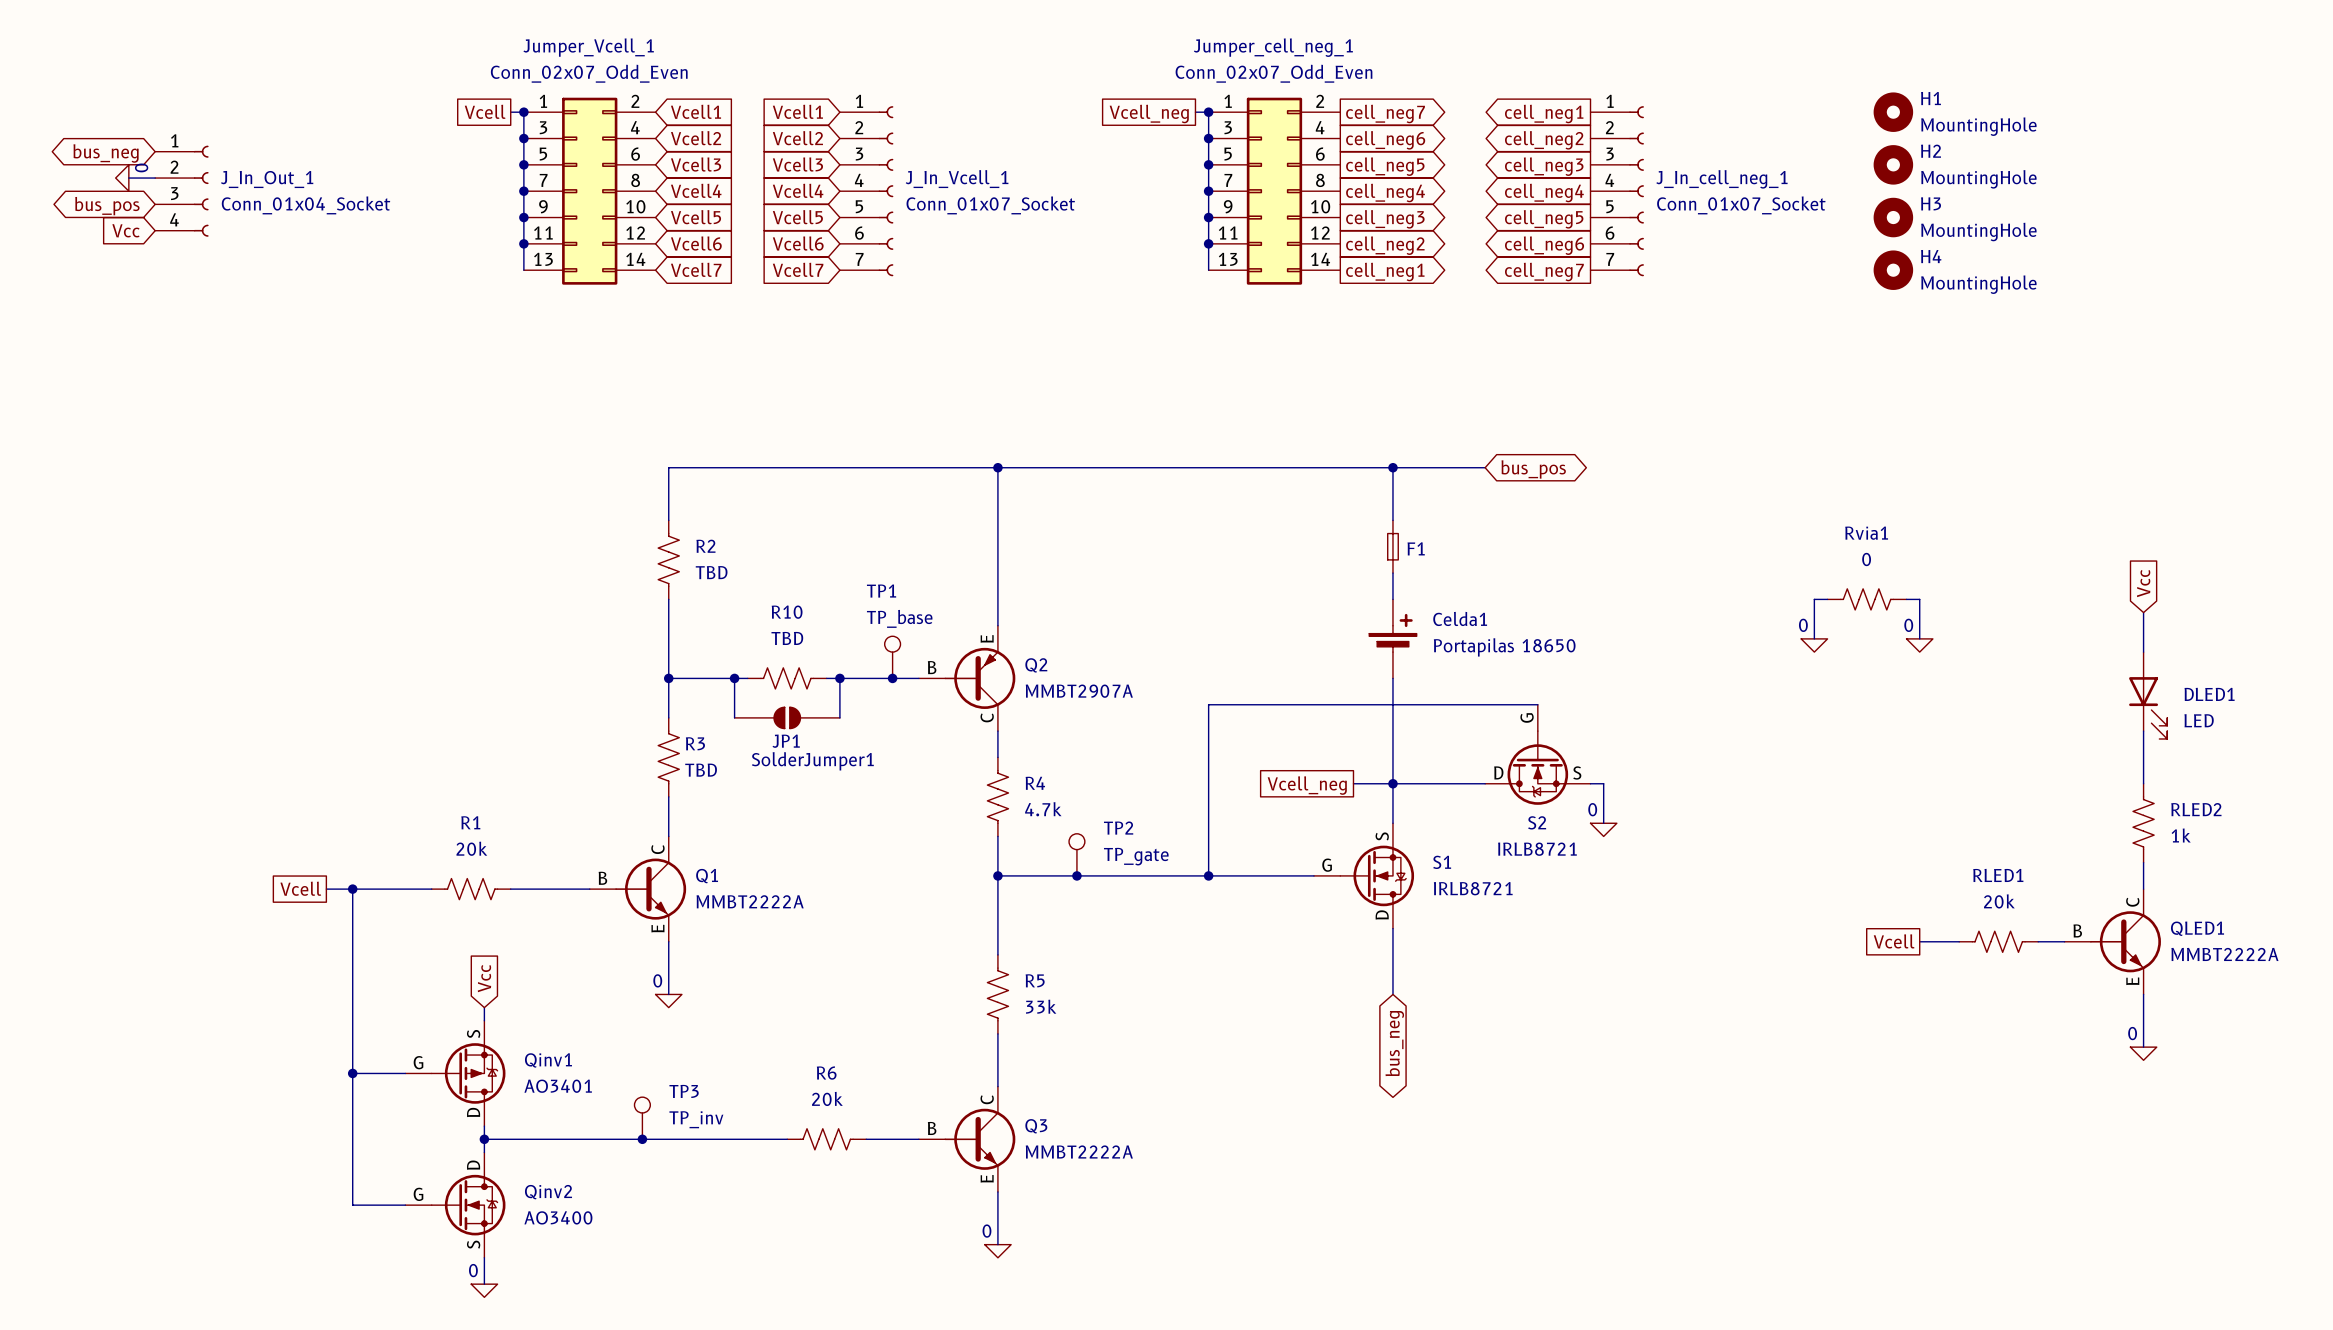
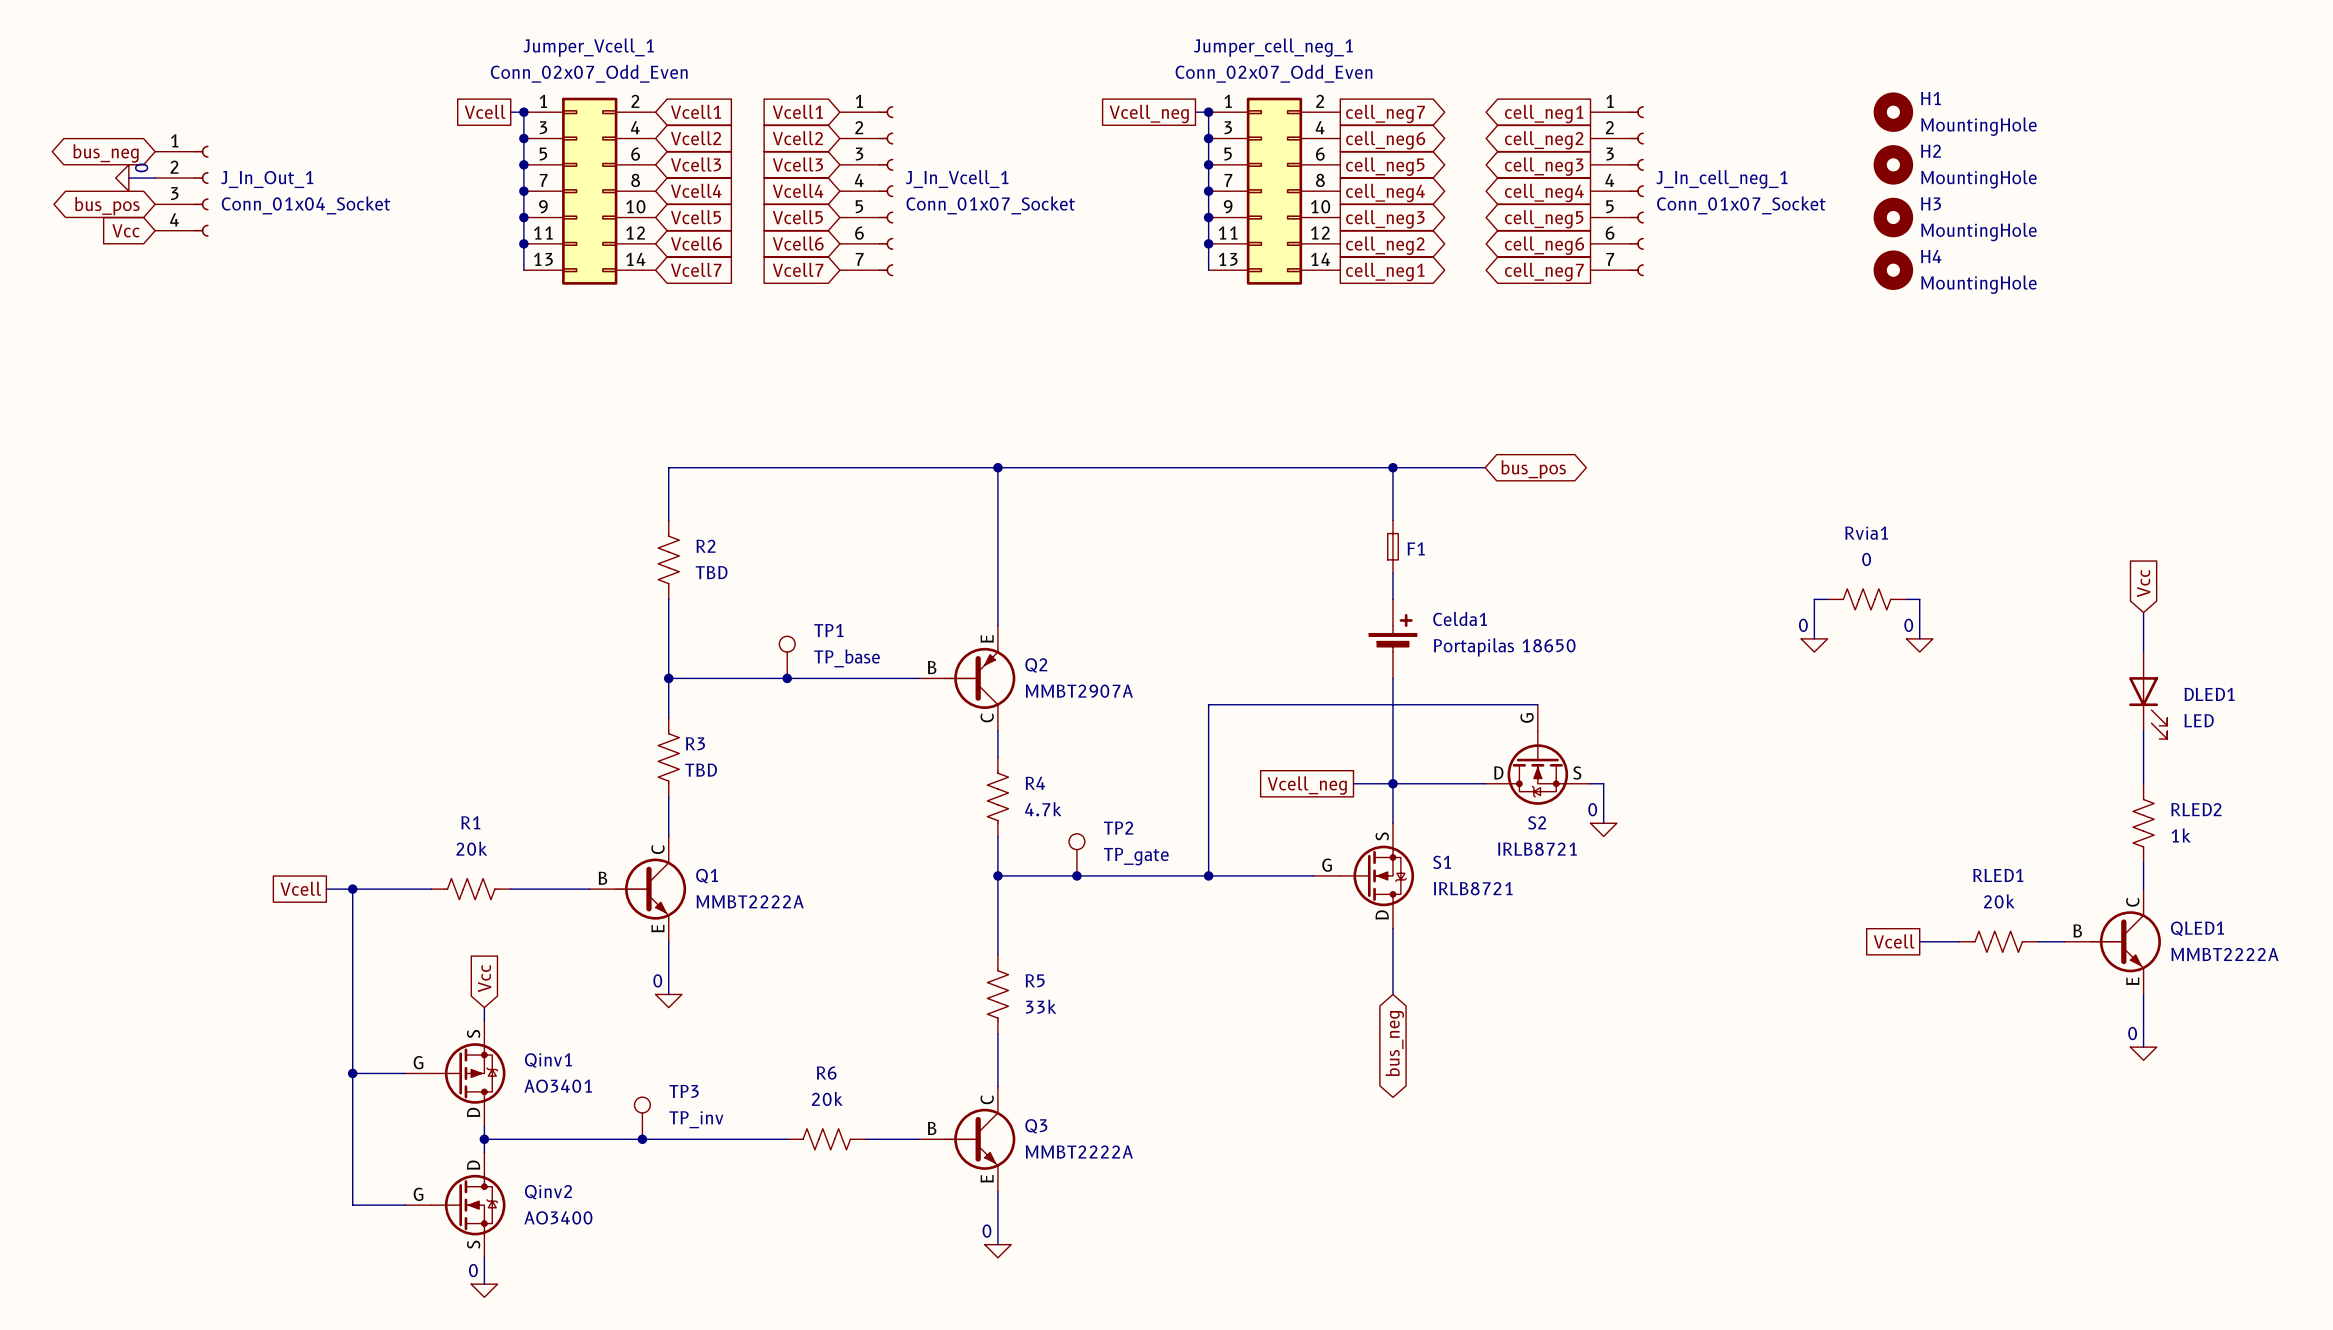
TP1 name position: TP1 (881, 591) -> TP1 (828, 630)
TP1 value position: TP_base (899, 618) -> TP_base (847, 658)
TP1 position: (892, 657) -> (787, 657)
wire: (734, 678) (734, 717) -> none
junction: (734, 678) -> none
junction: none -> (787, 678)
R10: TBD (787, 678) -> none
wire: (839, 678) (839, 717) -> none
junction: (839, 678) -> none
junction: (892, 678) -> none
JP1: SolderJumper1 (787, 717) -> none

